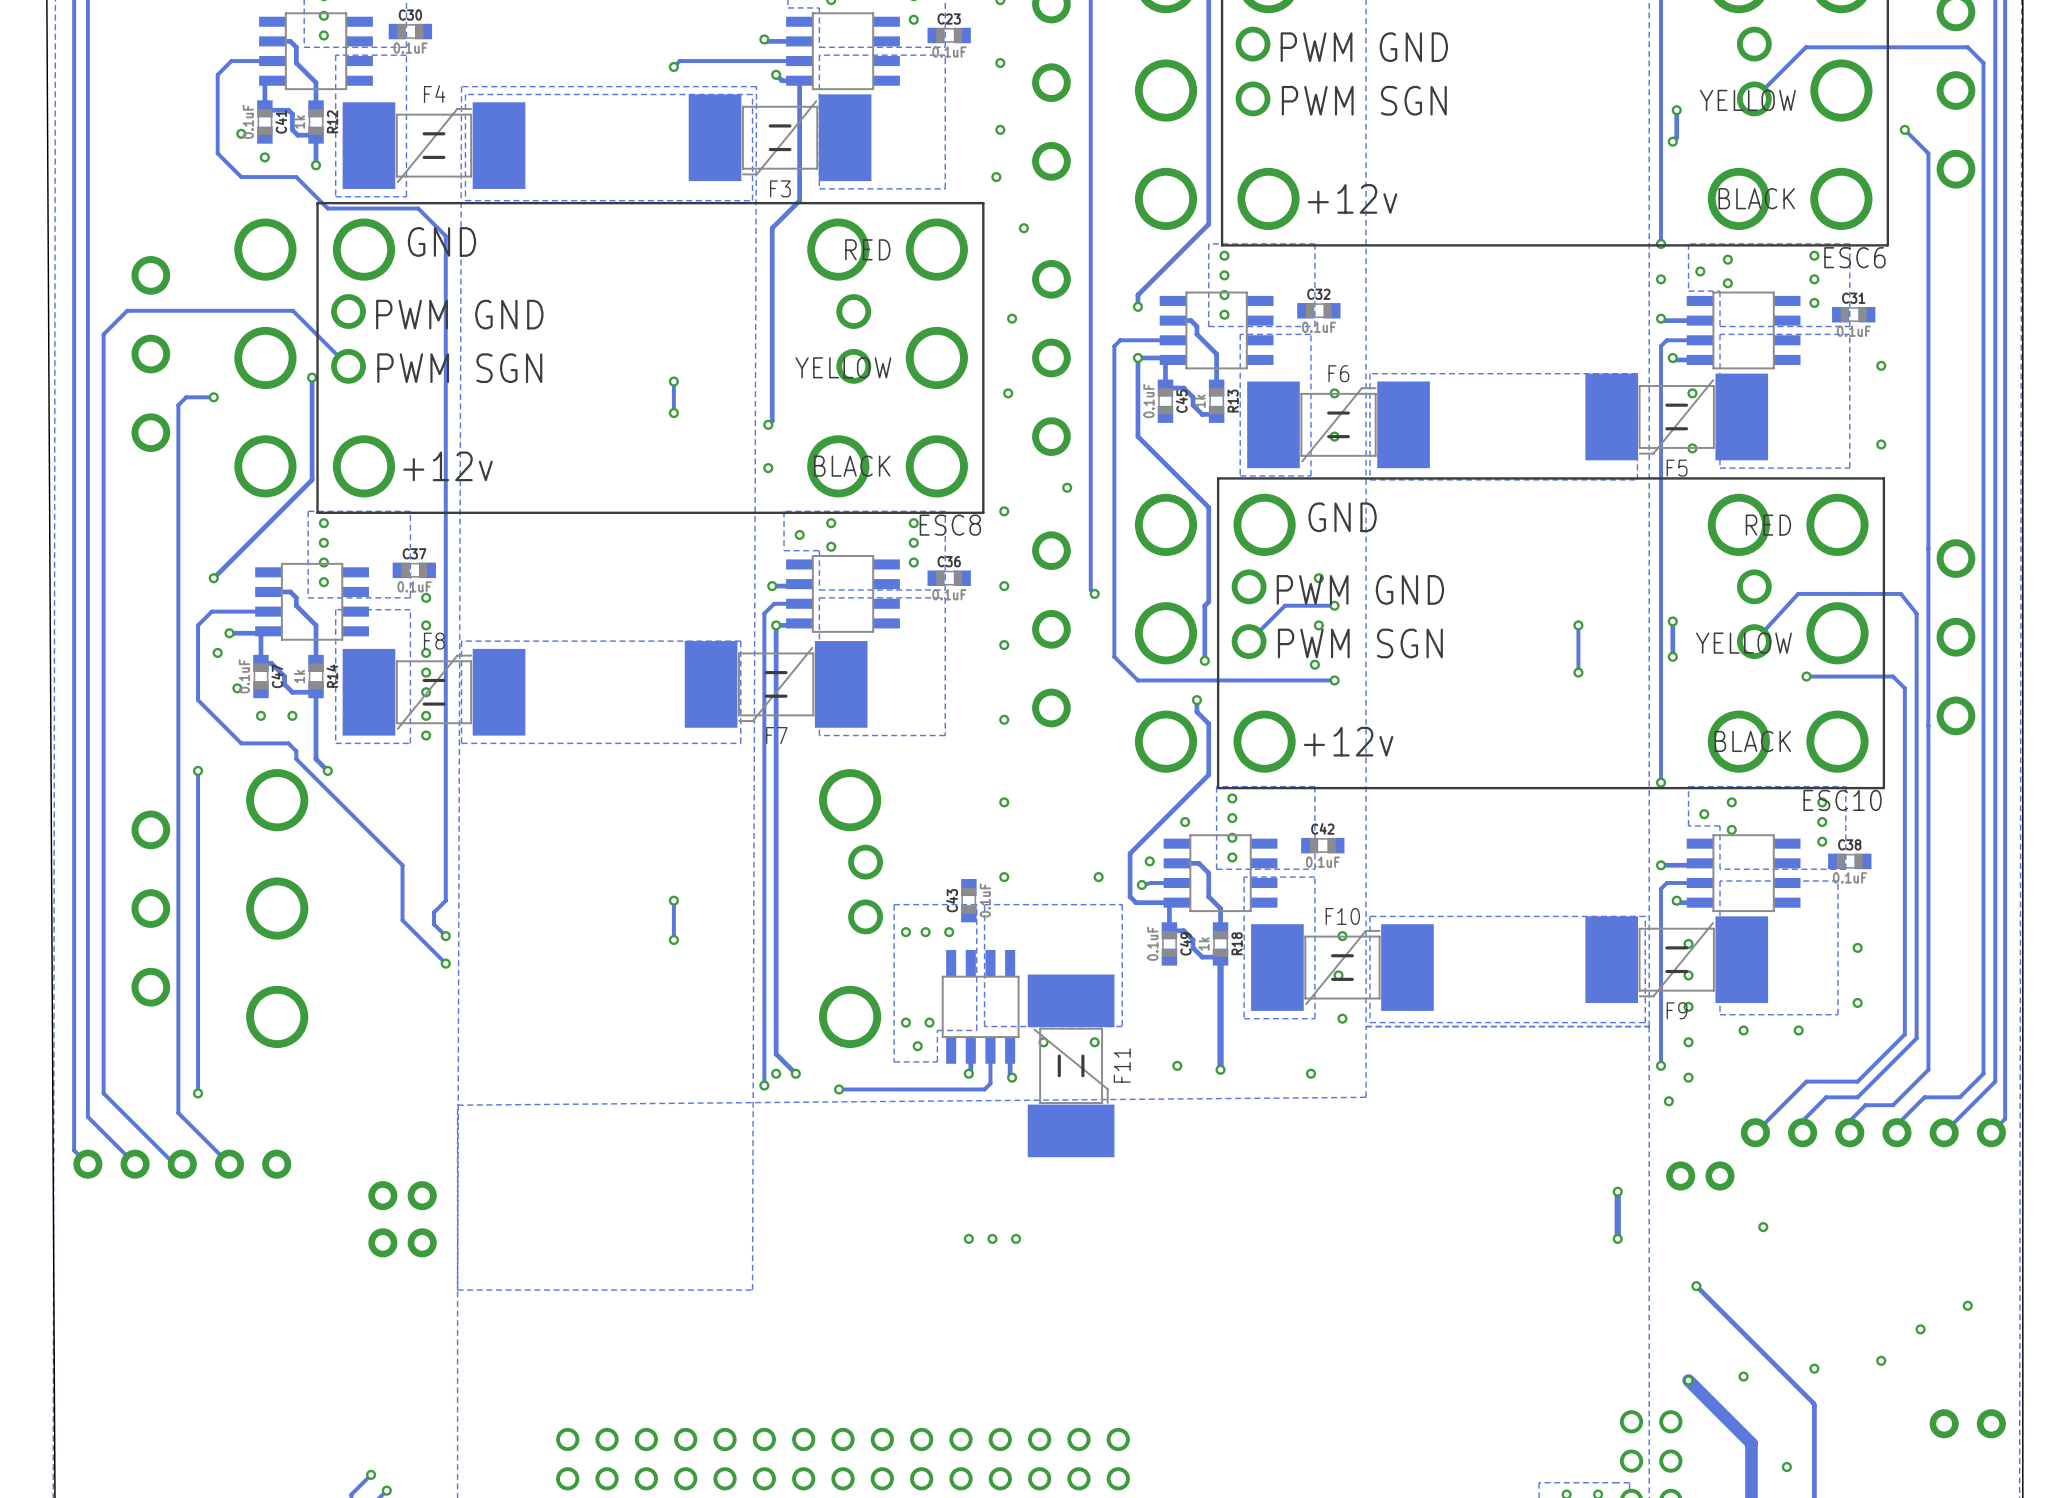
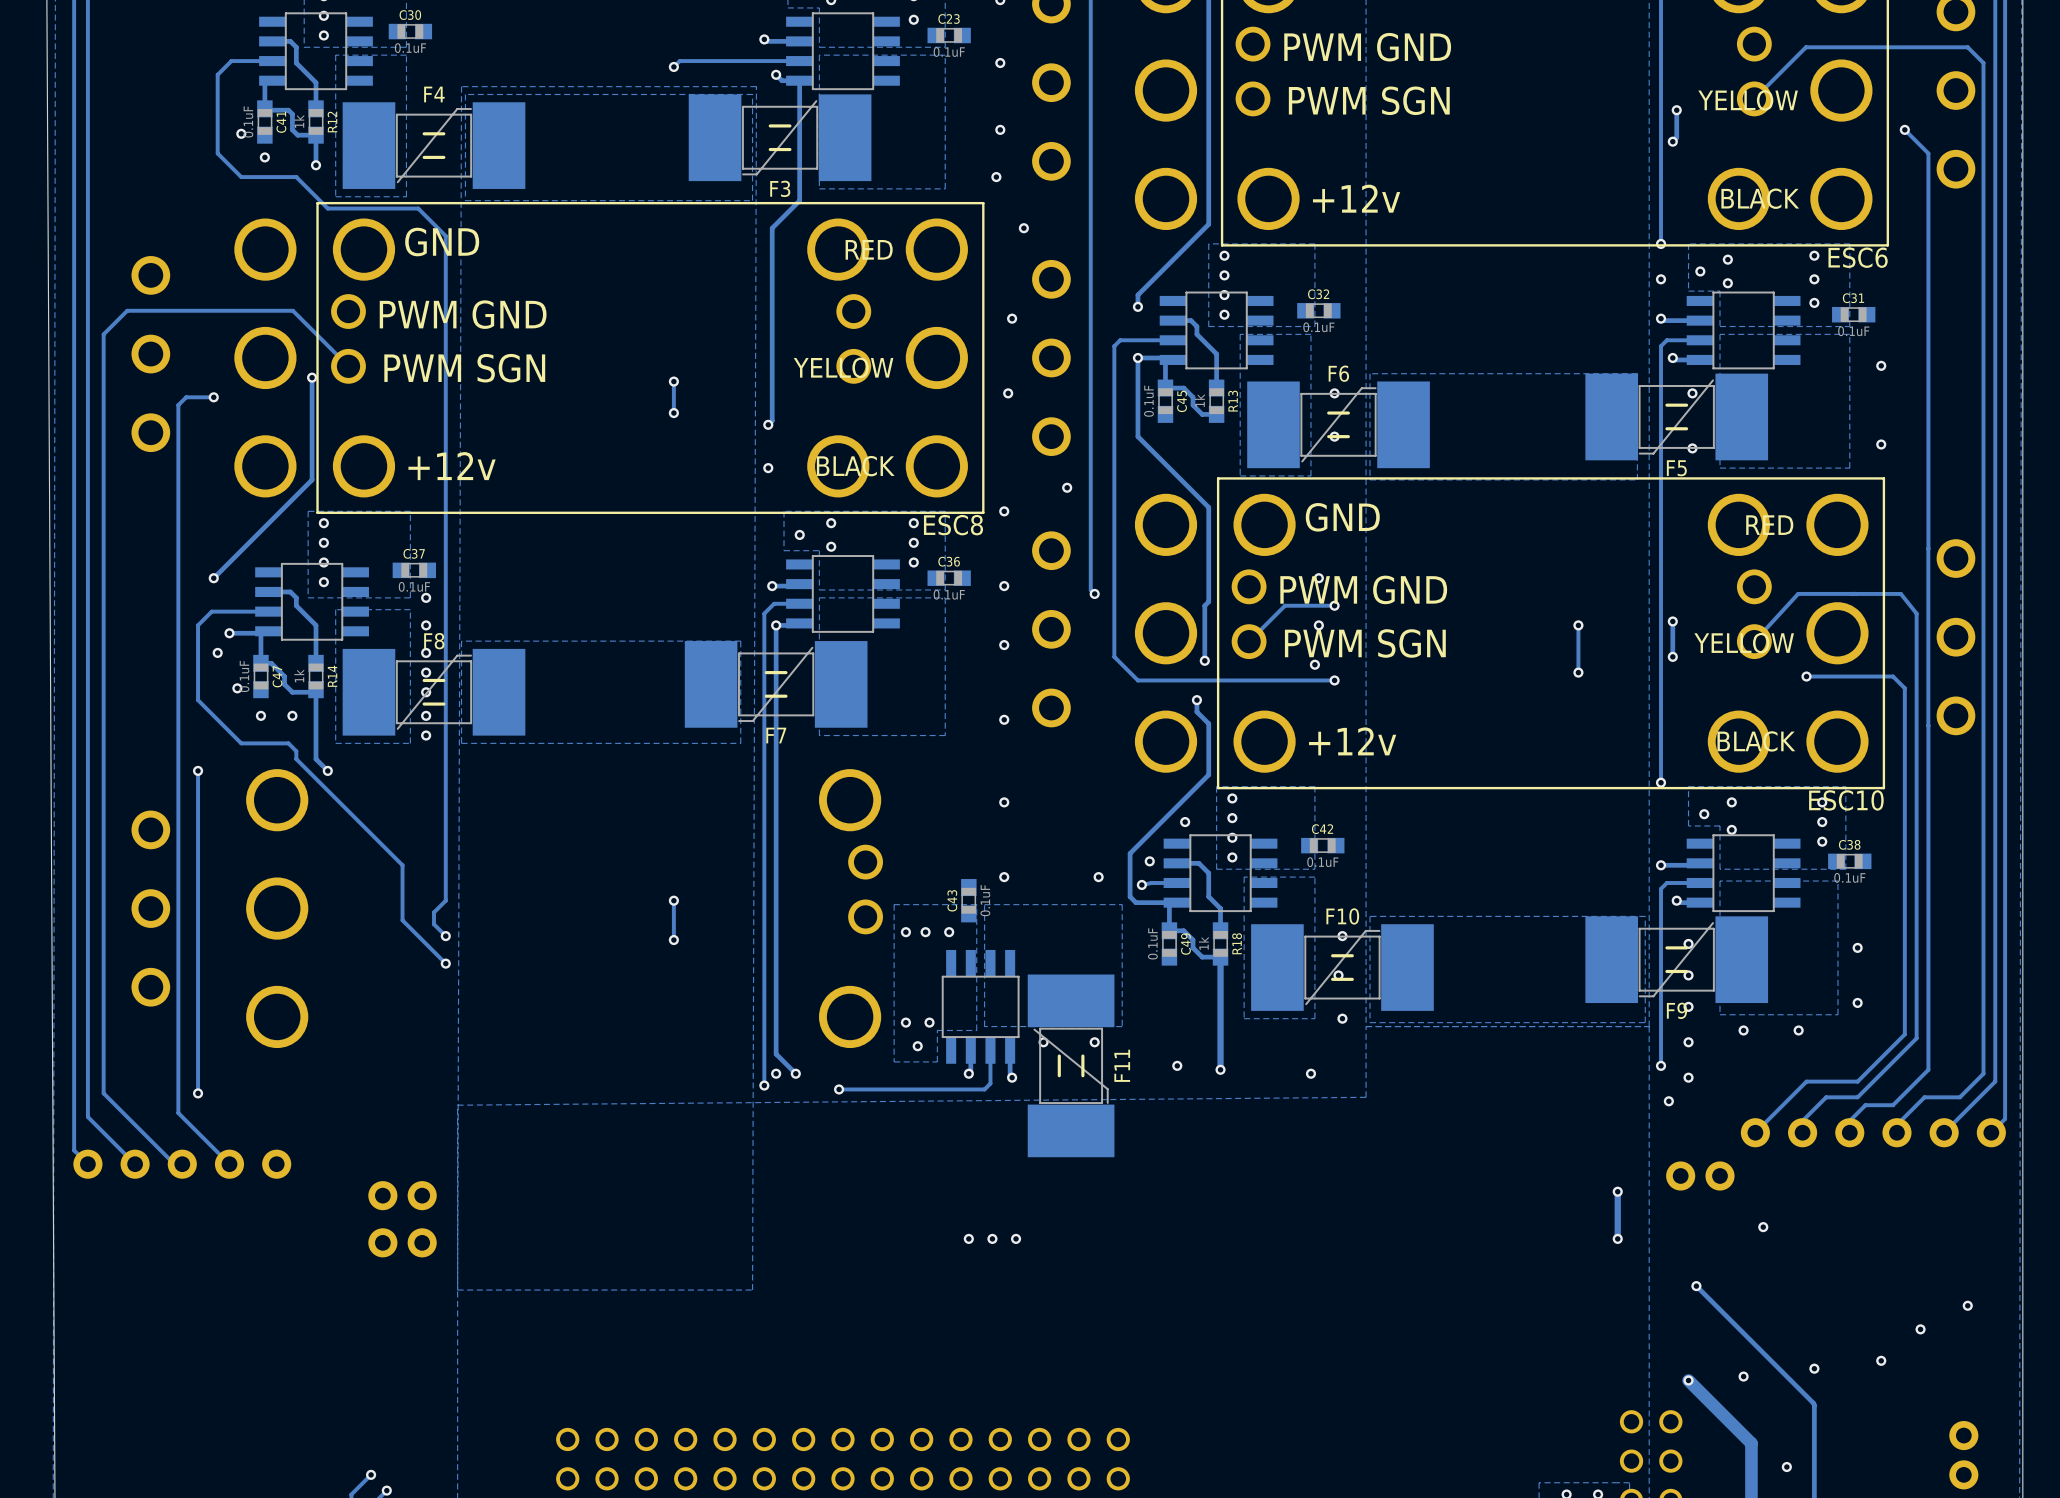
part: (1944, 1423) -> none
part: (1991, 1423) -> none
part: none -> (1963, 1435)
part: none -> (1963, 1474)

